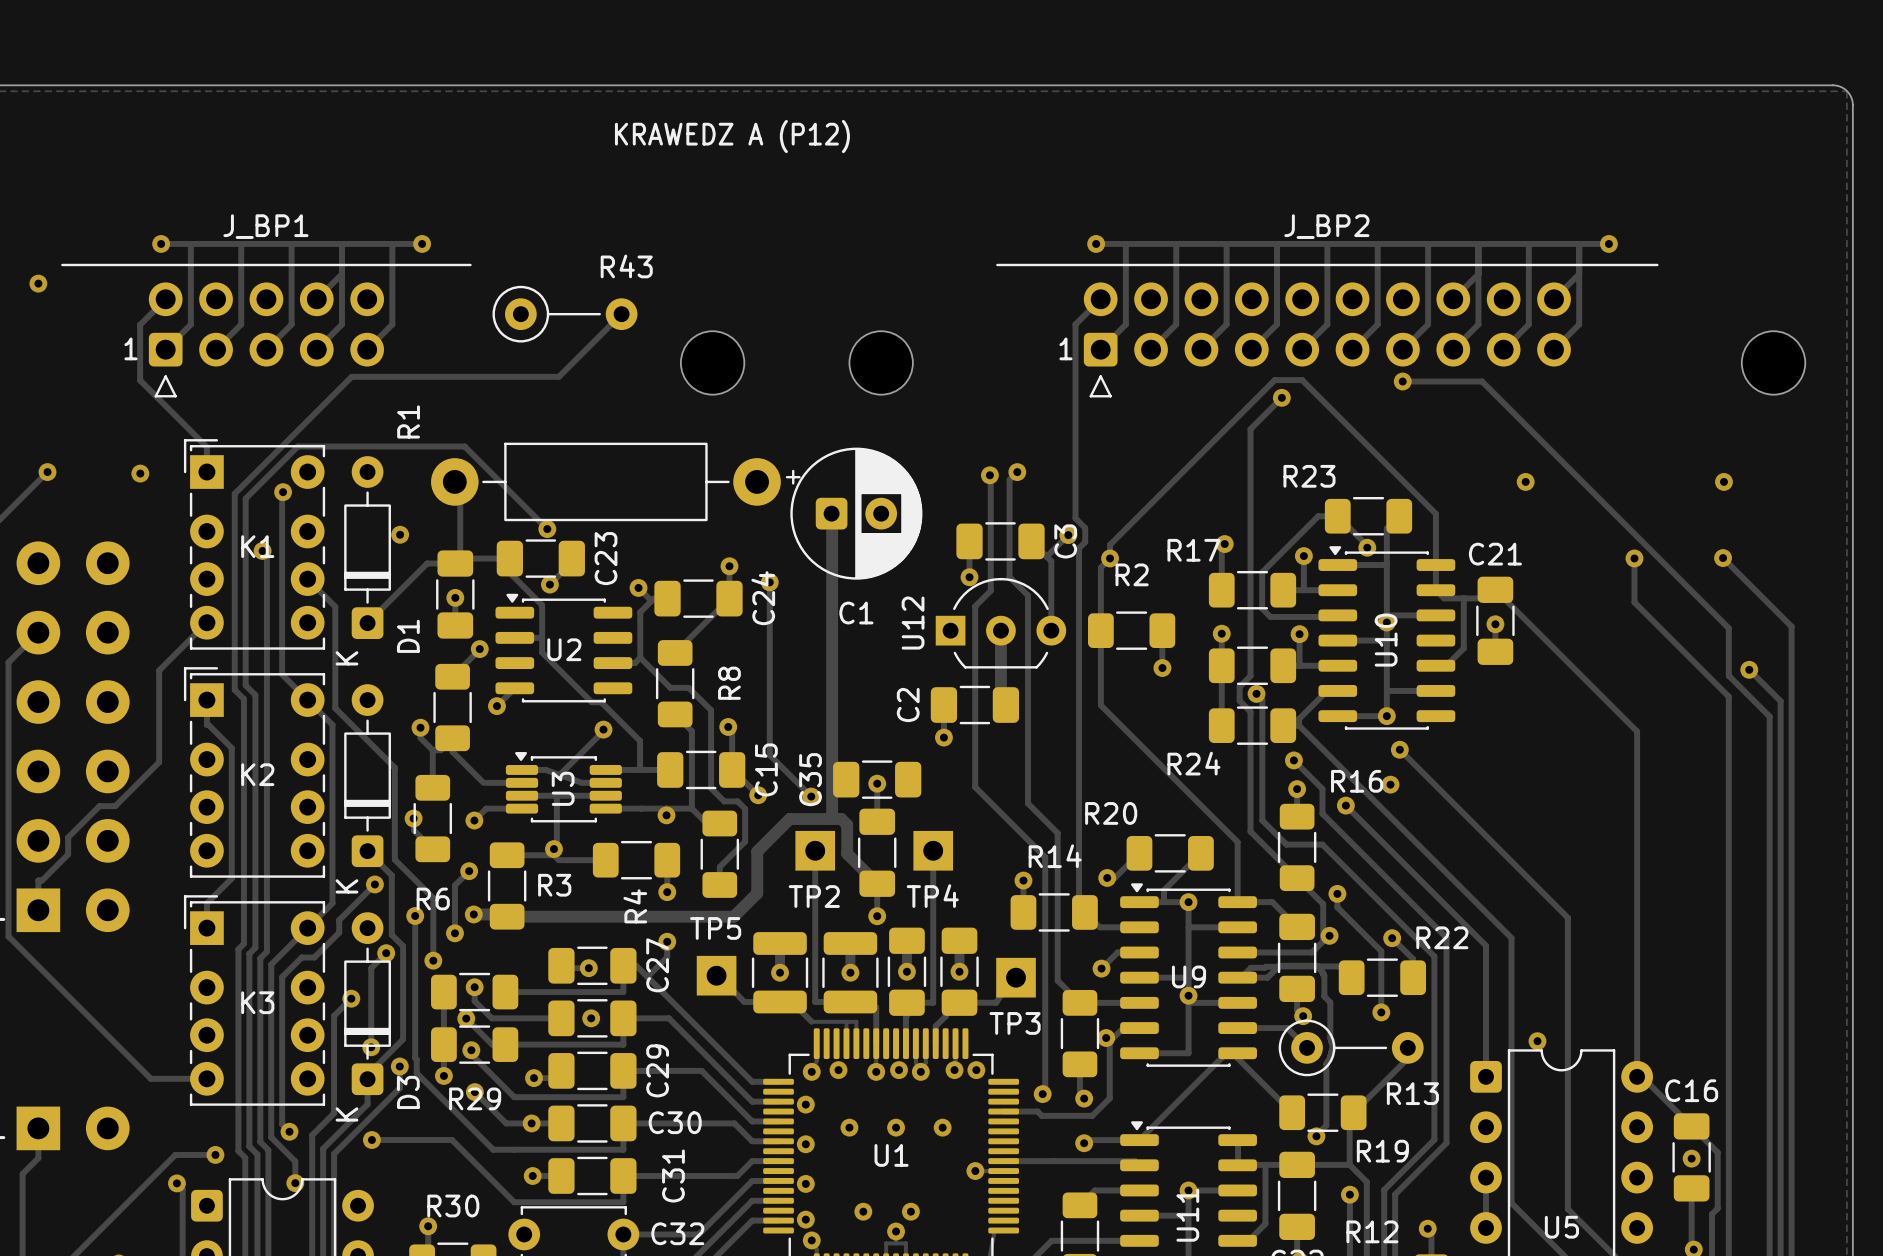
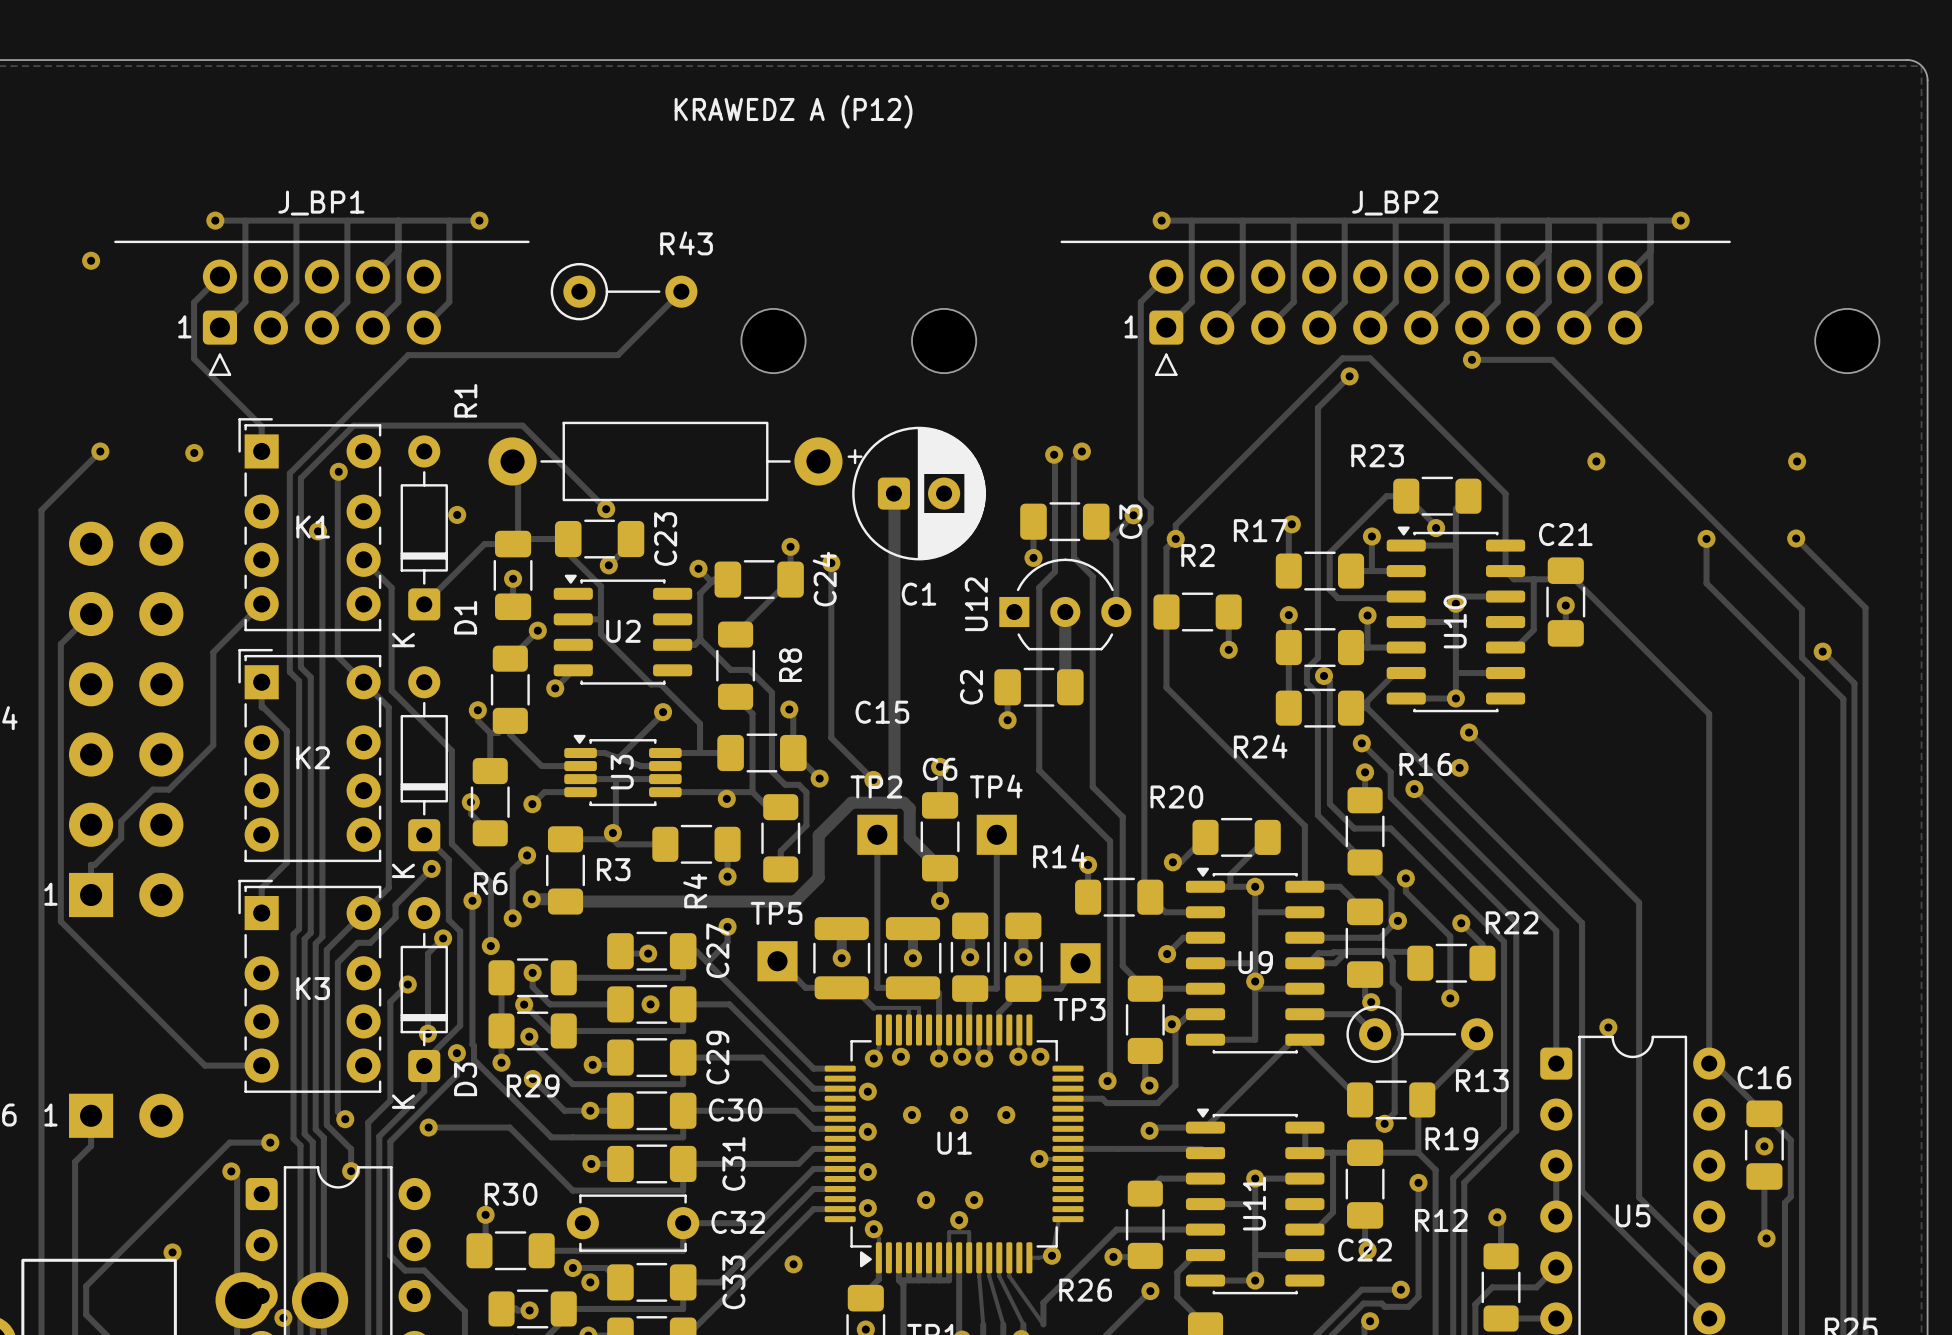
C15 name rotation: 0° (766, 769) -> 90° clockwise (882, 712)
C35: (877, 779) -> none
C6 name: none -> C6 (940, 769)
R14 name position: R14 (1055, 856) -> R14 (1059, 856)
TP2 name position: TP2 (814, 896) -> TP2 (876, 786)
TP4 name position: TP4 (932, 896) -> TP4 (996, 786)

